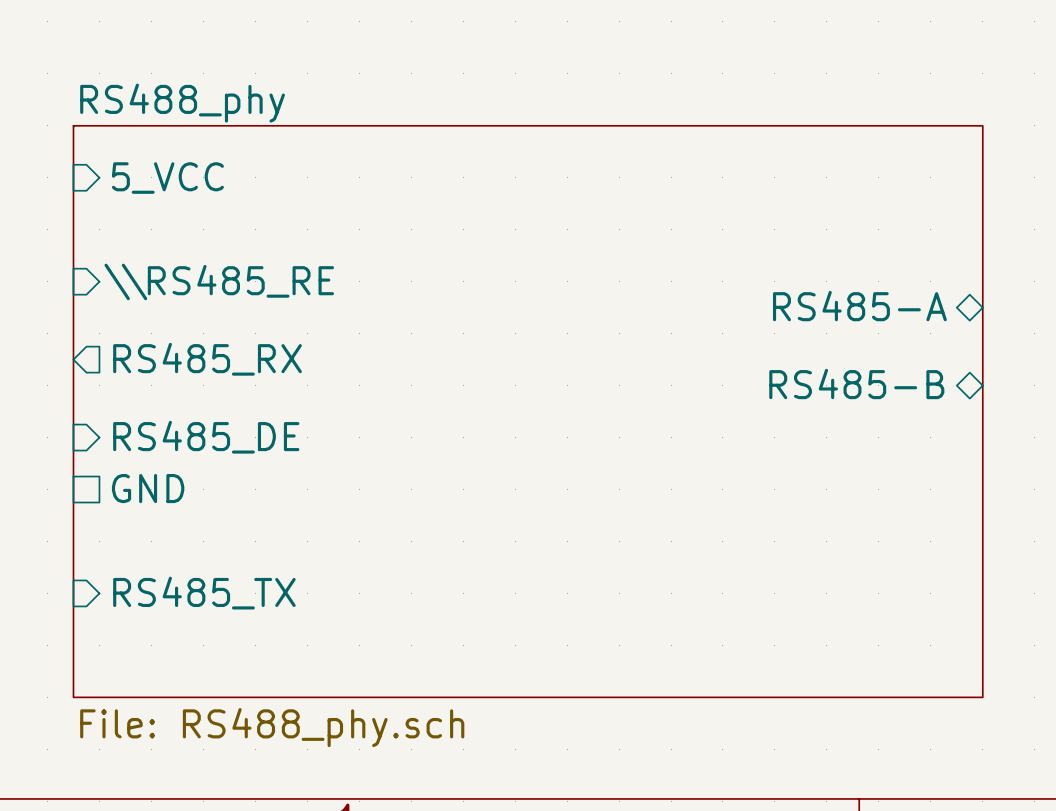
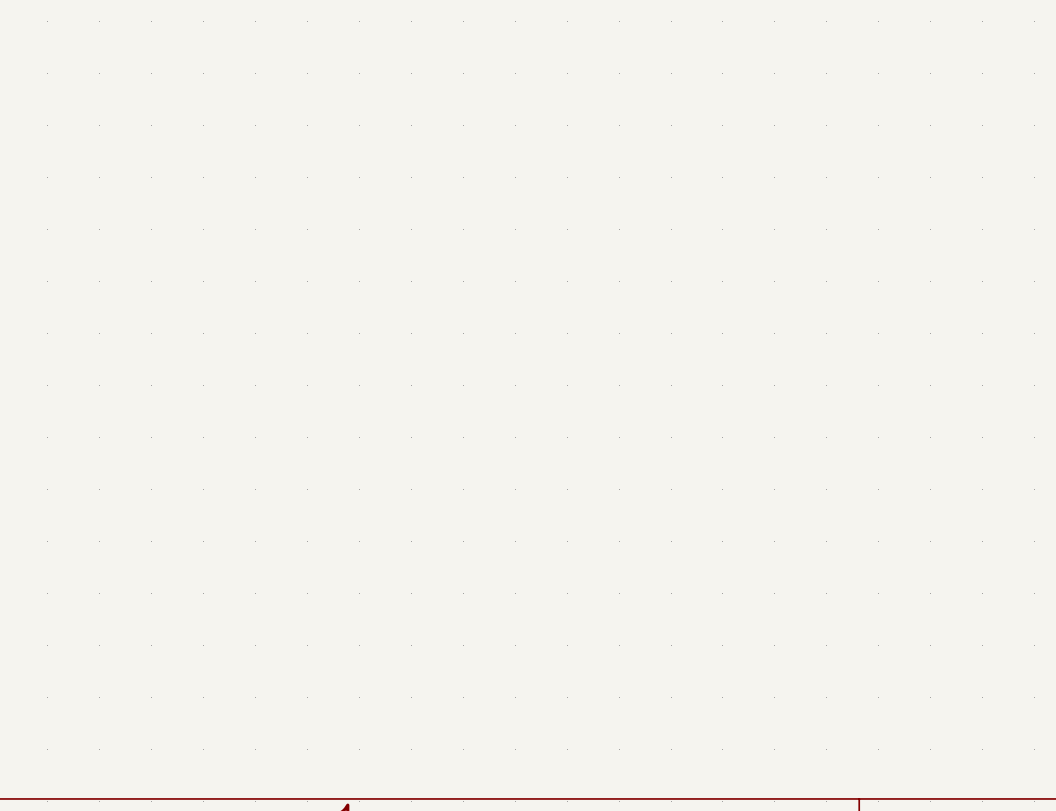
sheet pin: 5_VCC (167, 178) -> none
sheet pin: \\RS485_RE (219, 281) -> none
sheet pin: RS485-A (859, 306) -> none
sheet pin: RS485_RX (207, 359) -> none
sheet pin: RS485-B (856, 384) -> none
sheet RS488_phy: File: RS488_phy.sch (528, 411) -> none
sheet pin: RS485_DE (206, 437) -> none
sheet pin: GND (148, 488) -> none
sheet pin: RS485_TX (204, 593) -> none

